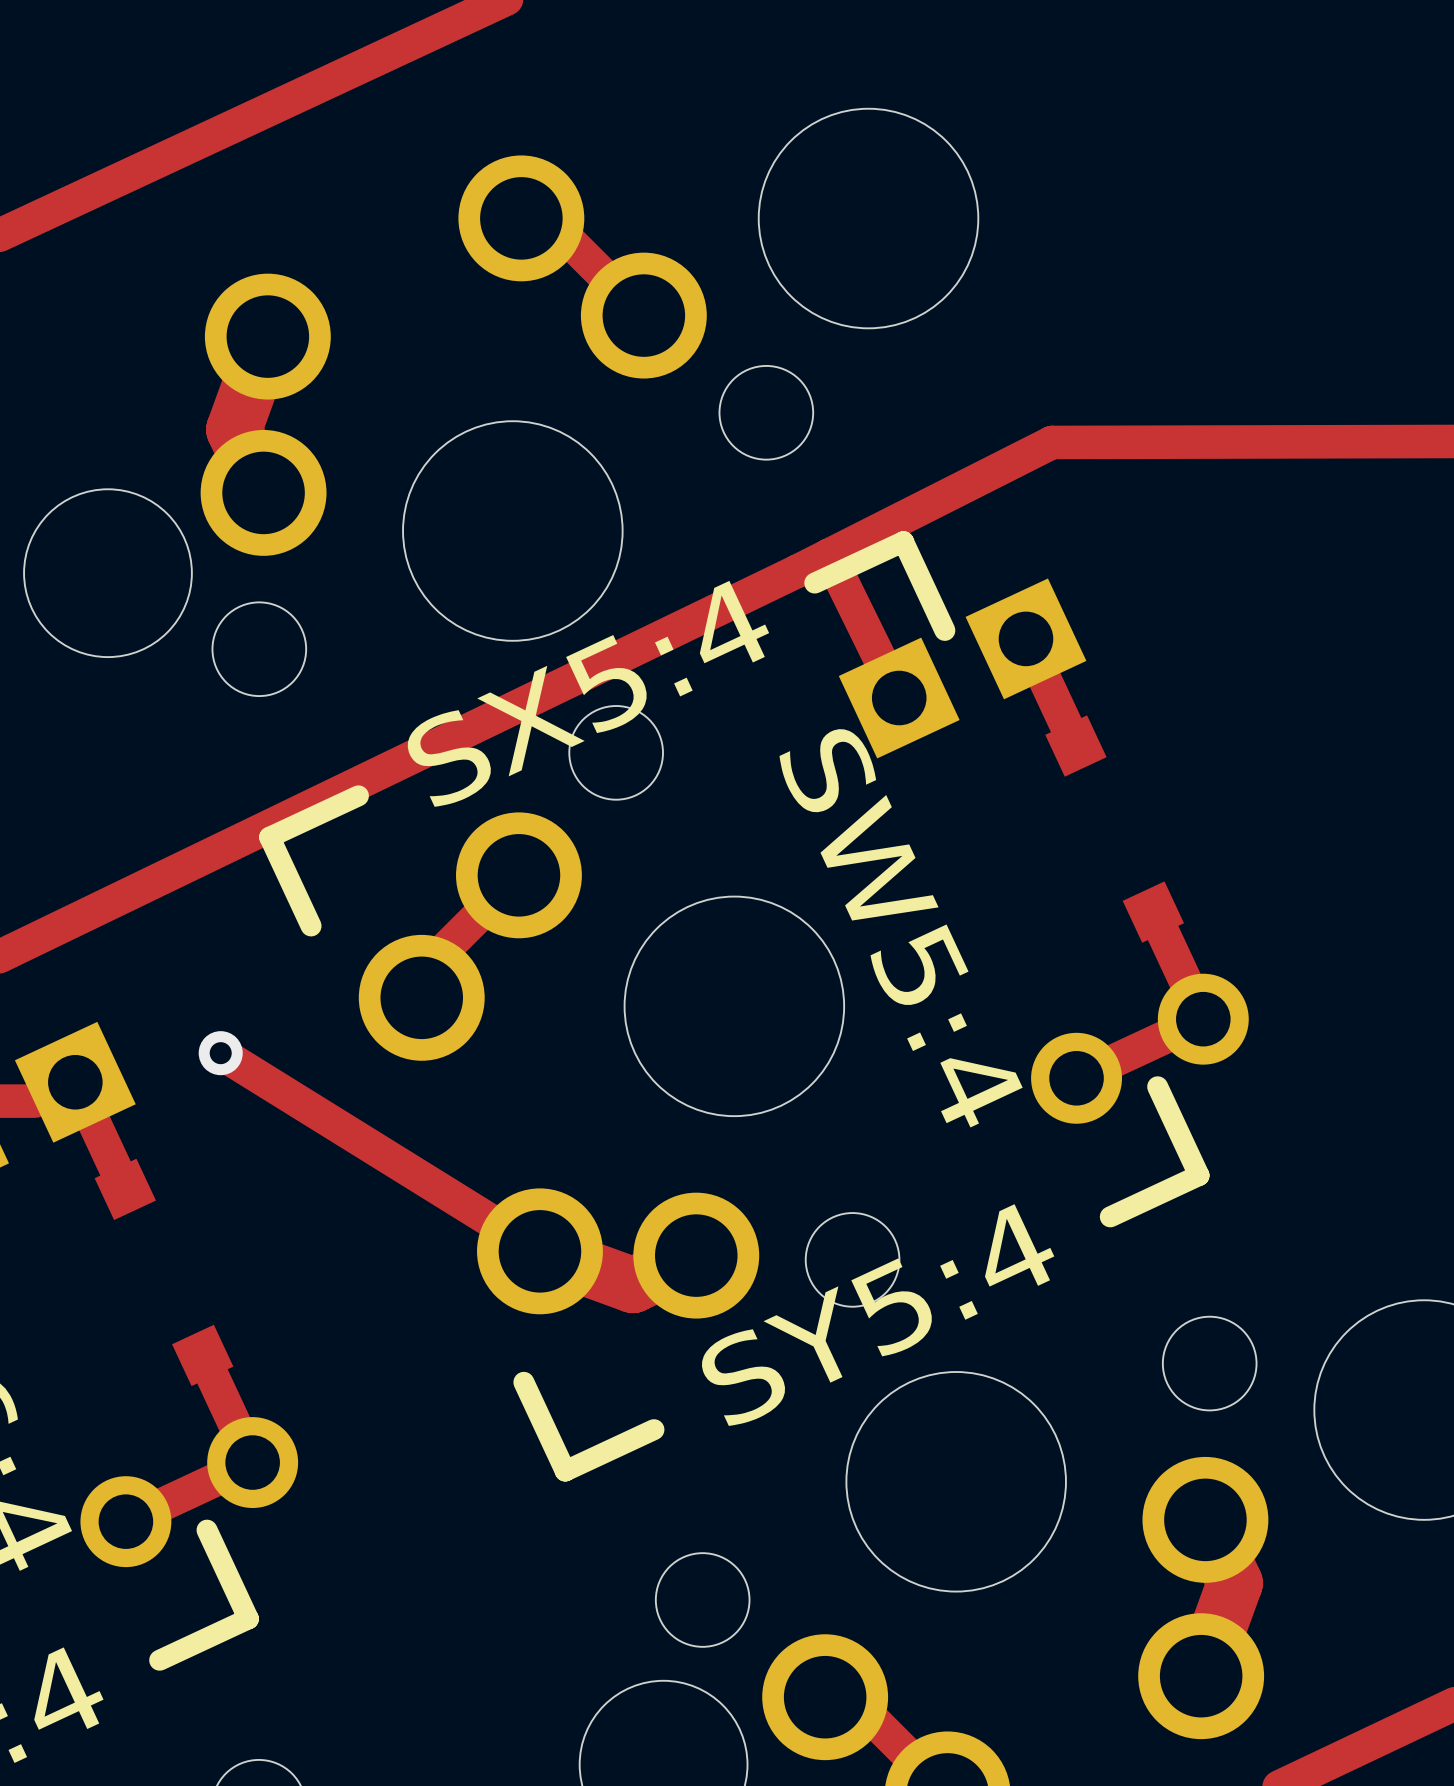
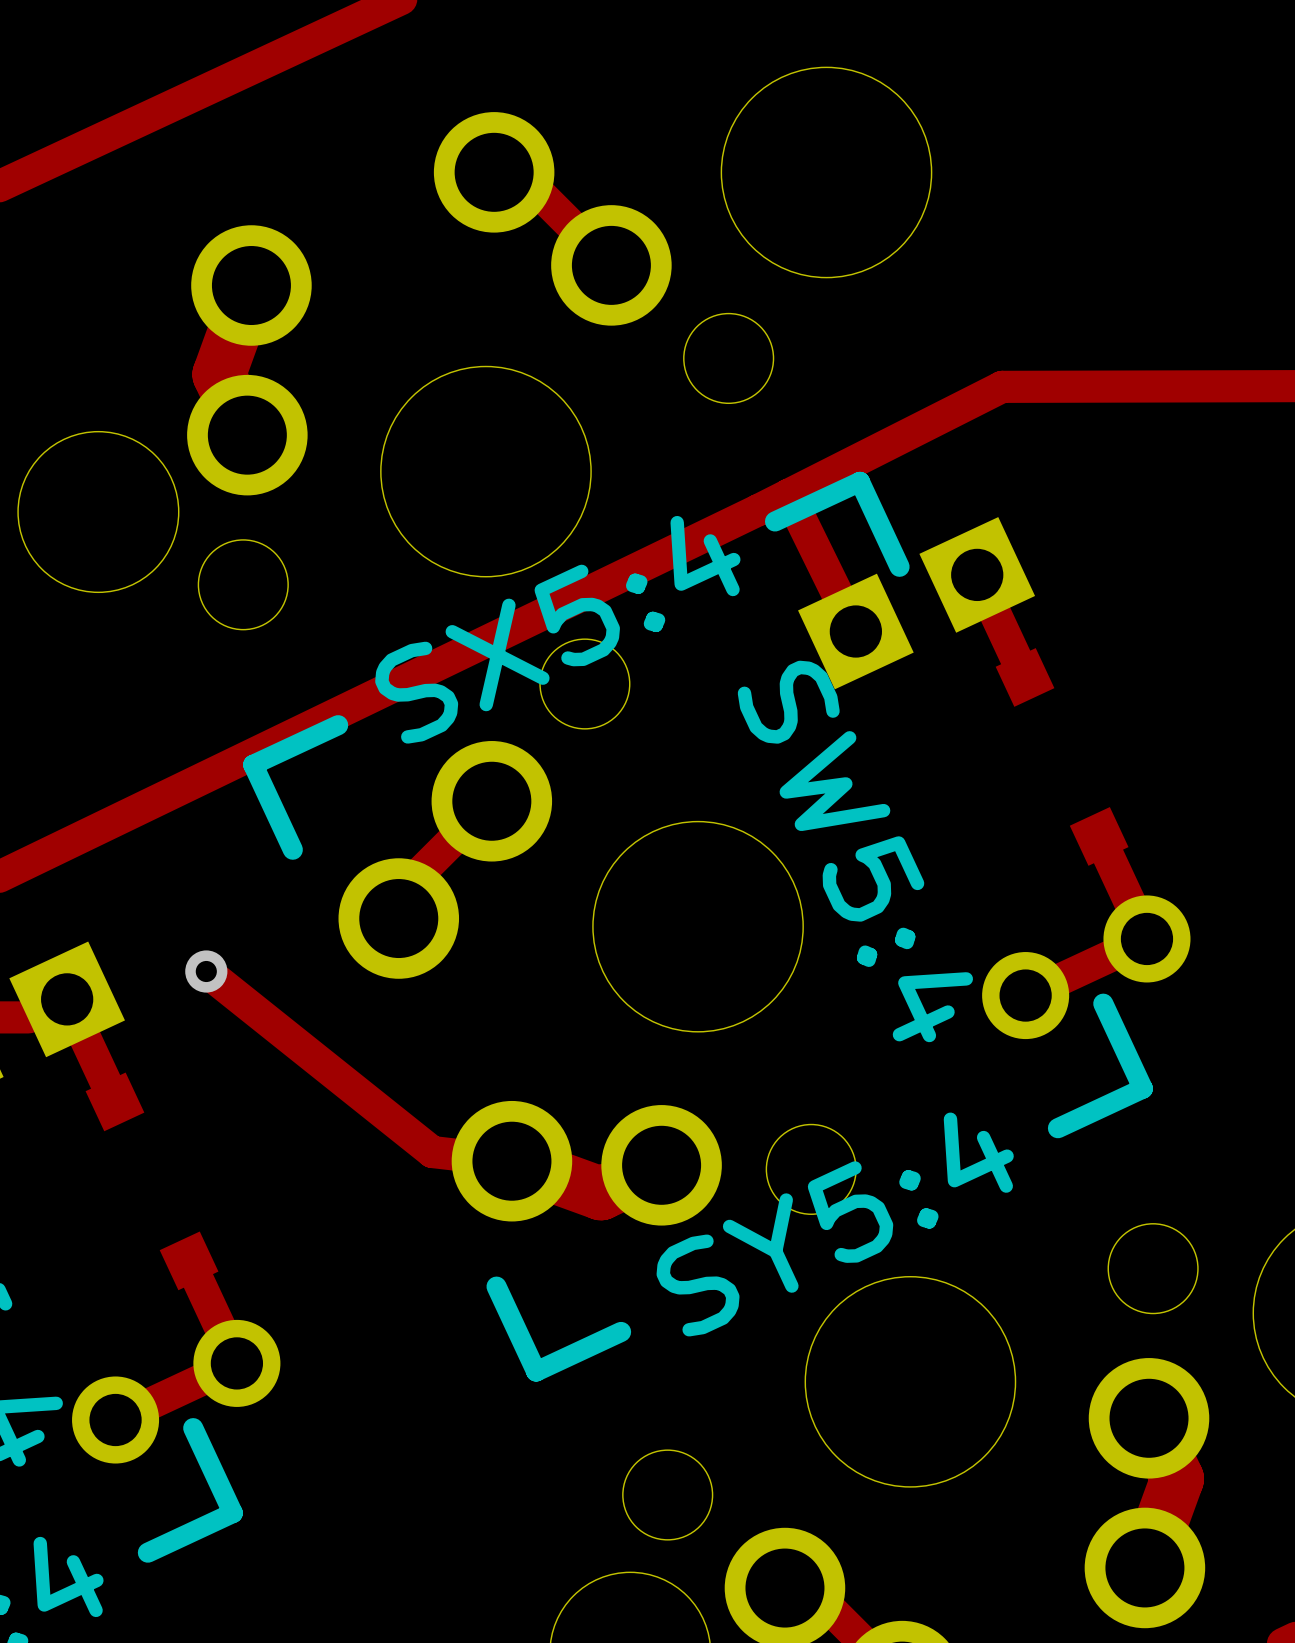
track: (220, 1053) (539, 1251) -> (206, 971) (432, 1152) (511, 1161)

